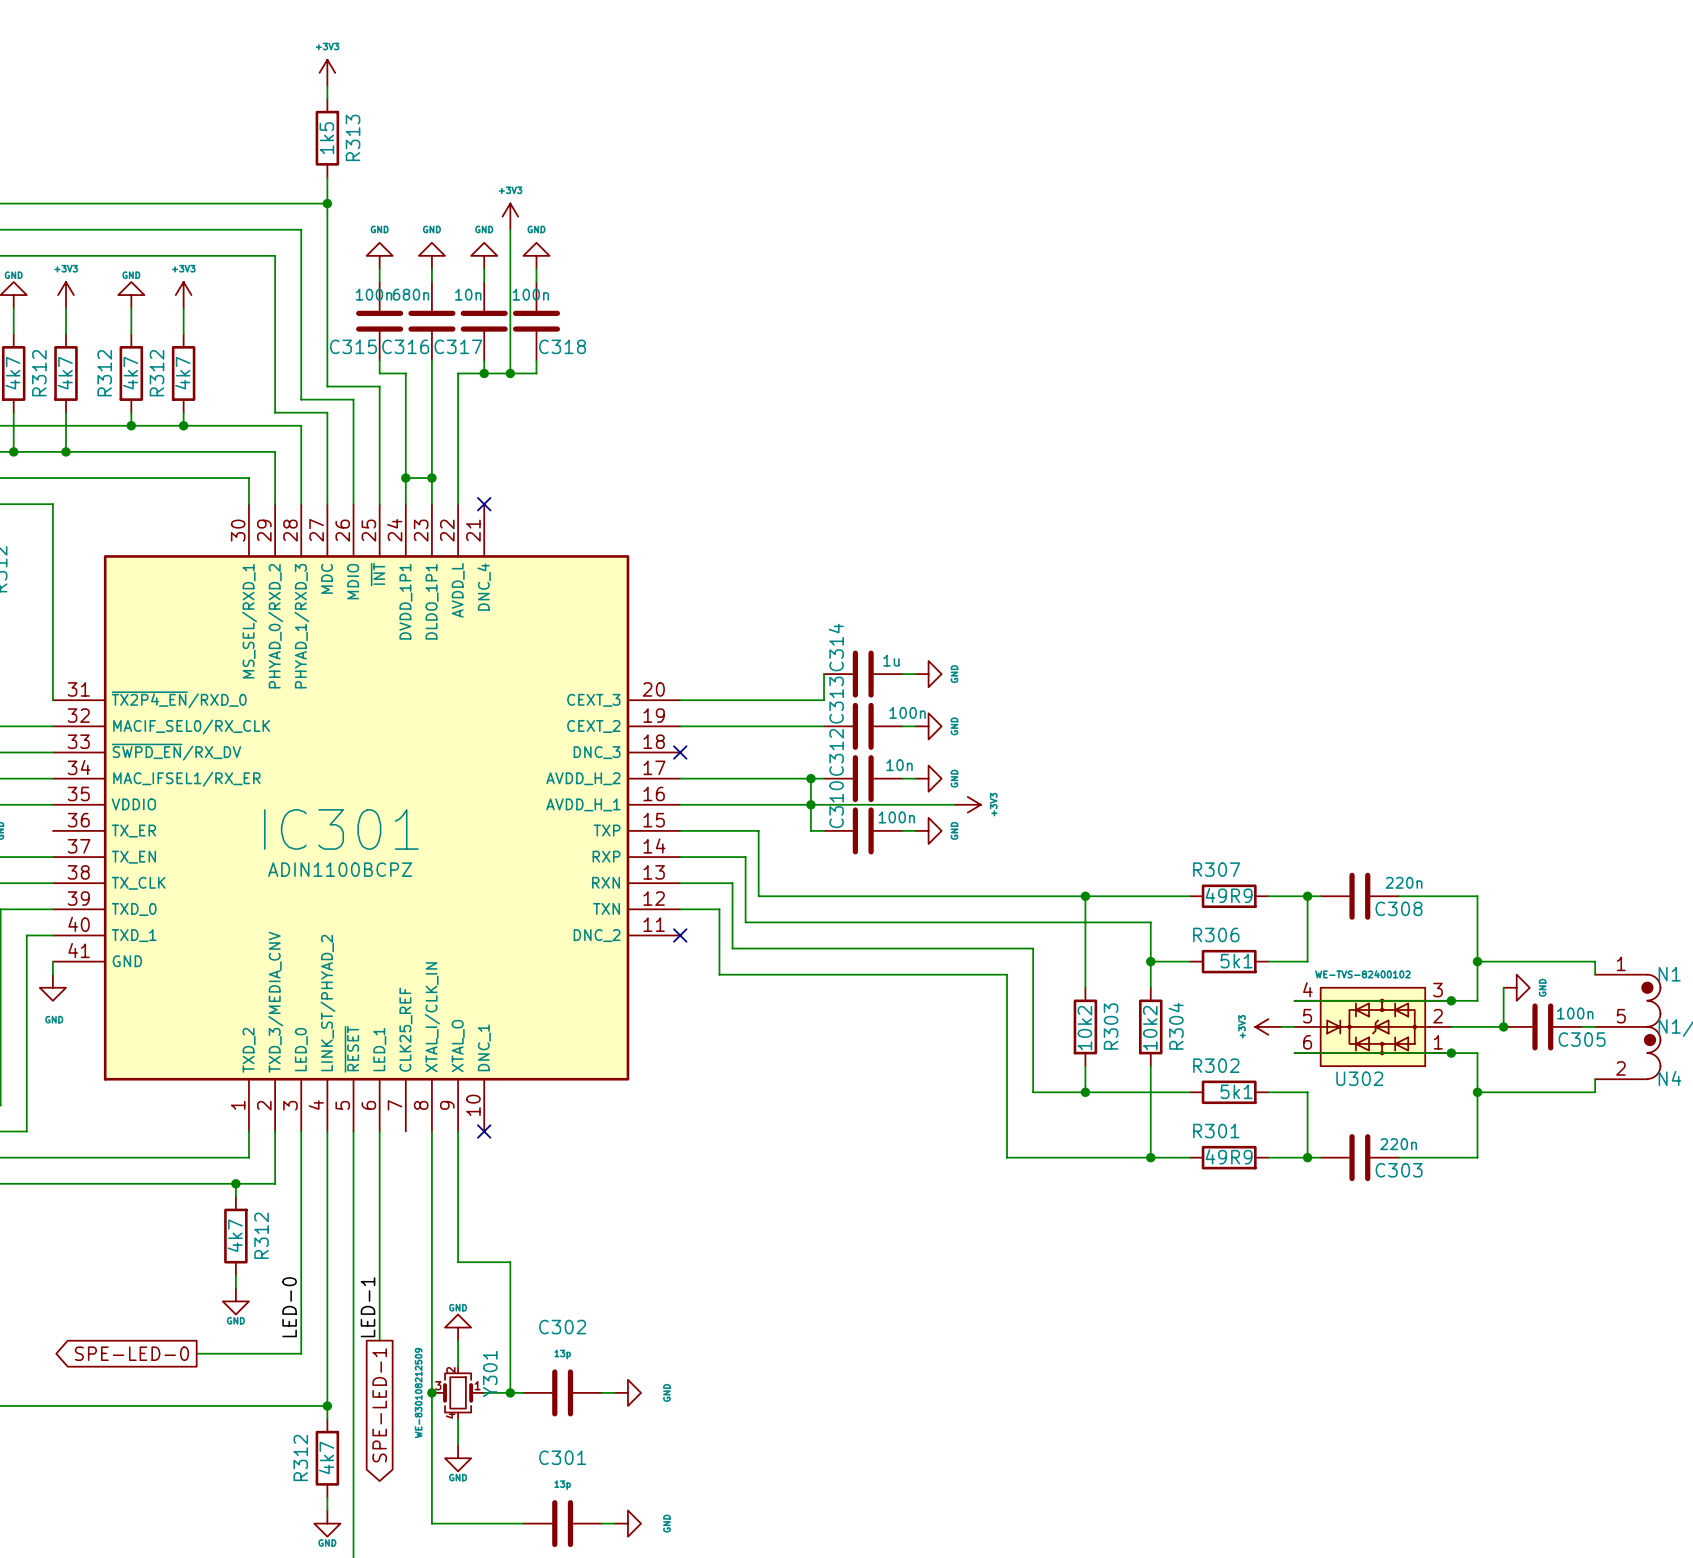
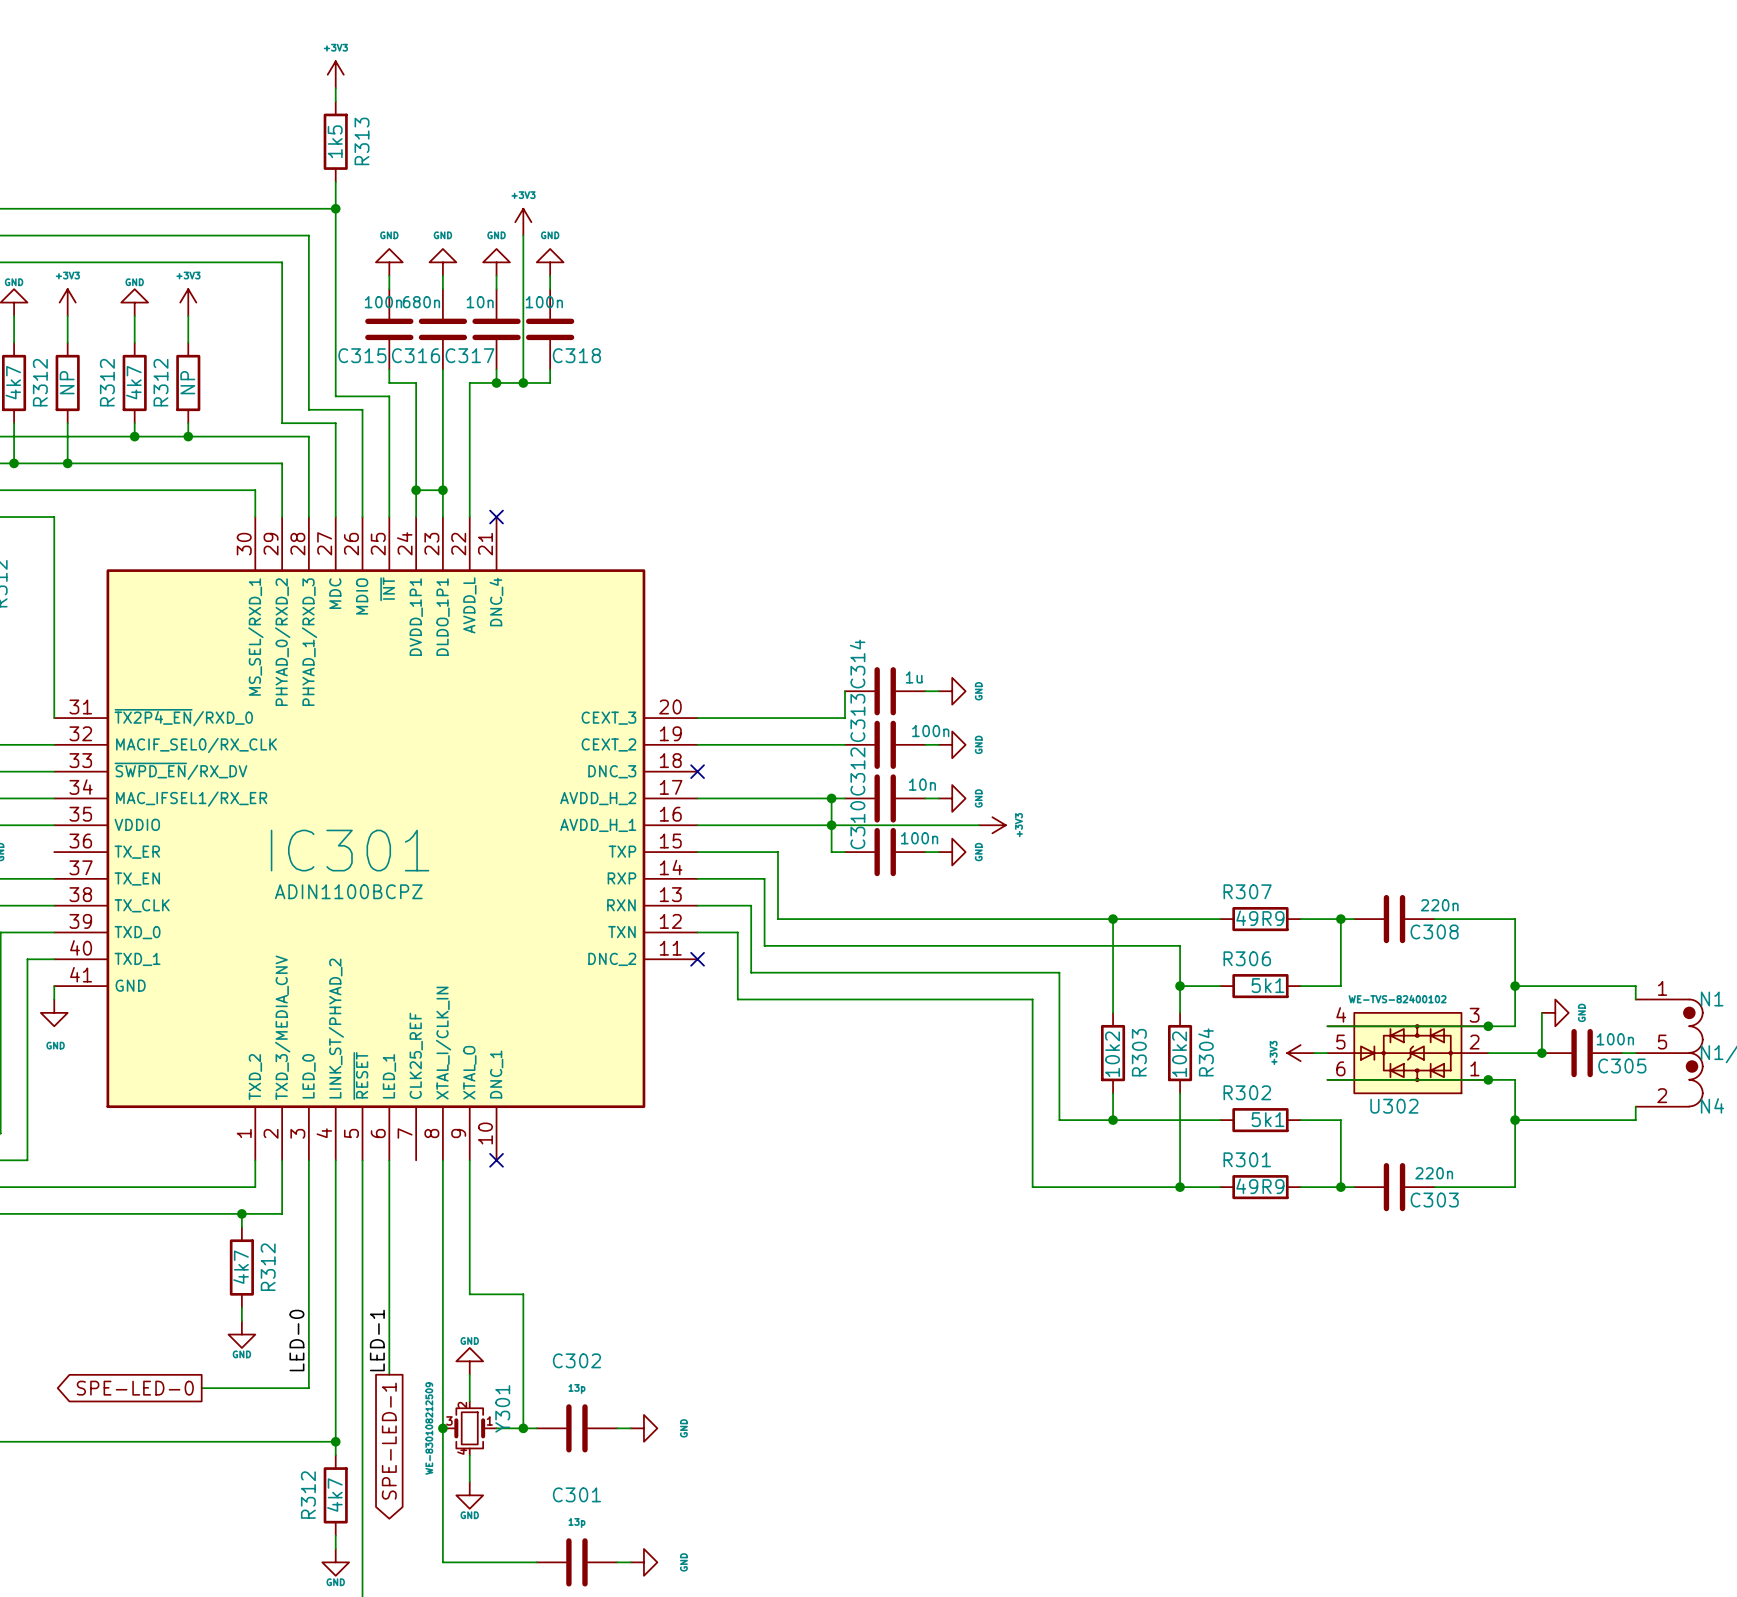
R312 value: 4k7 (65, 373) -> NP (67, 382)
R312 value: 4k7 (182, 373) -> NP (187, 382)

